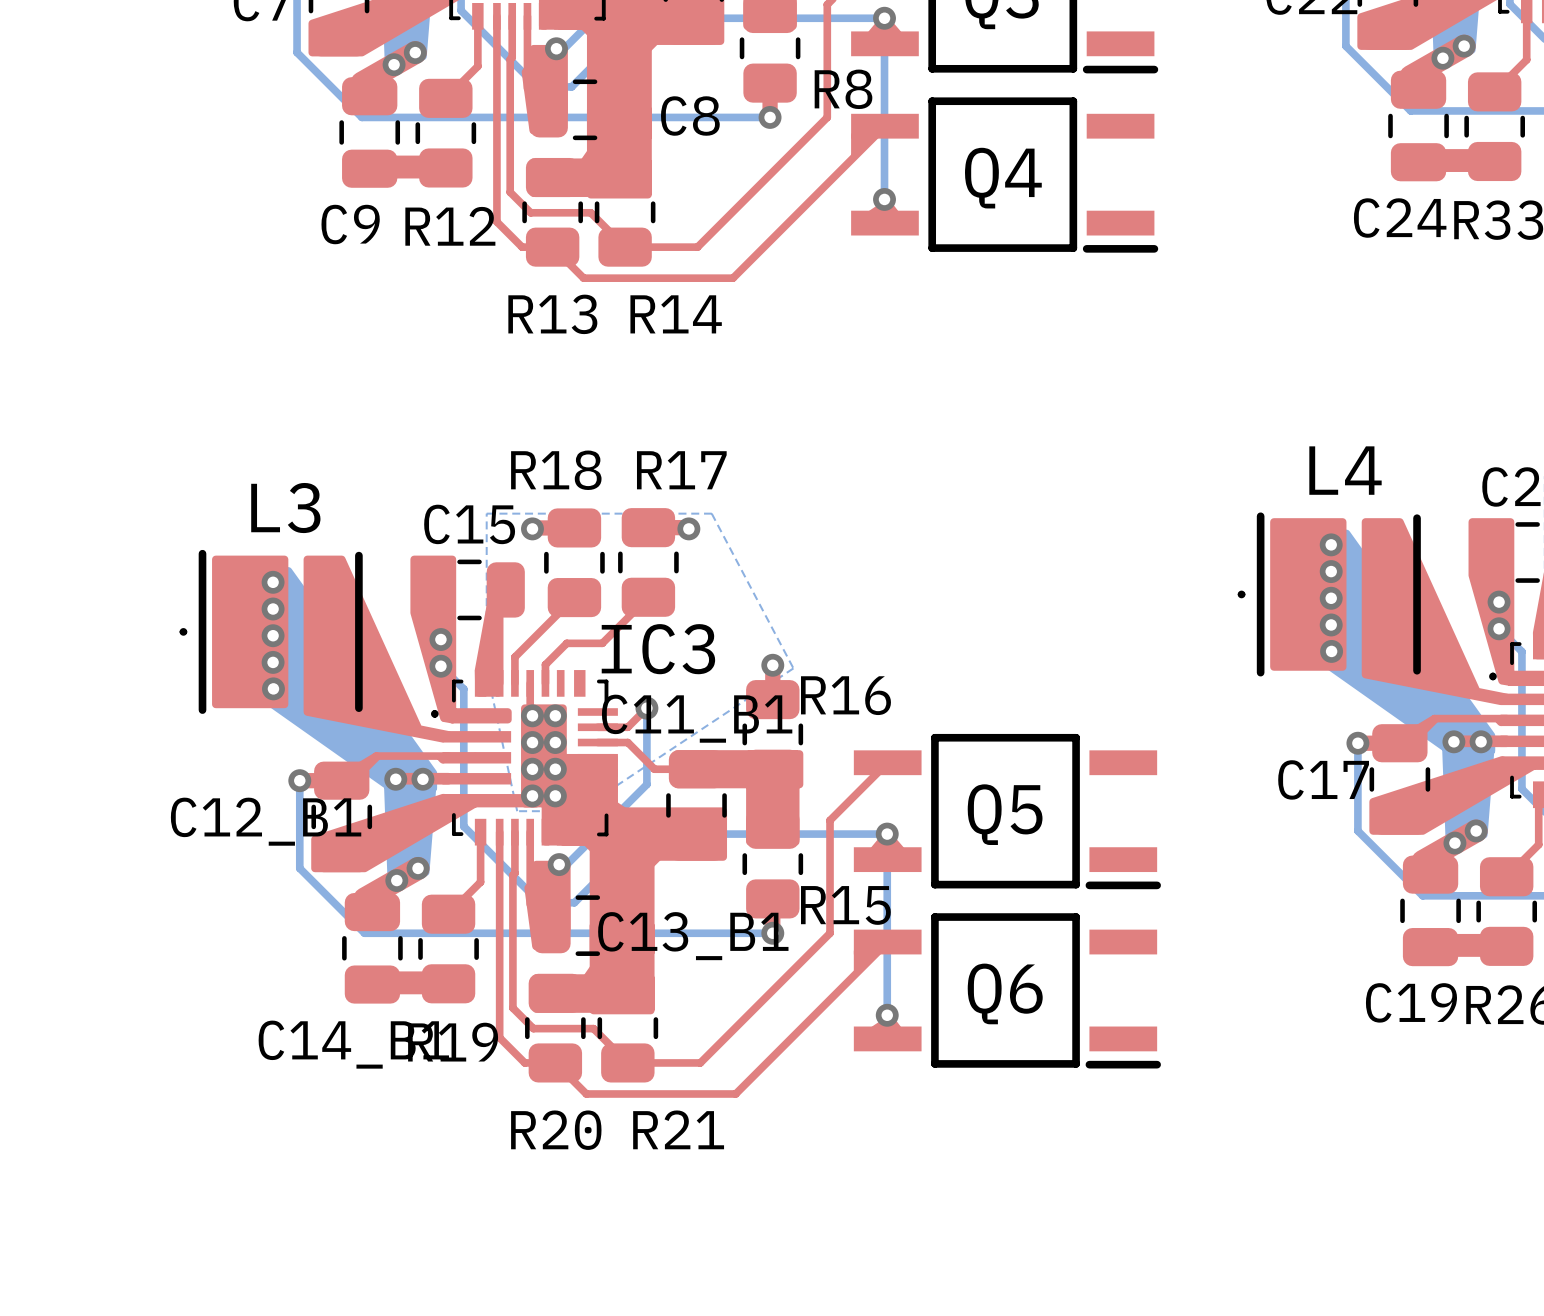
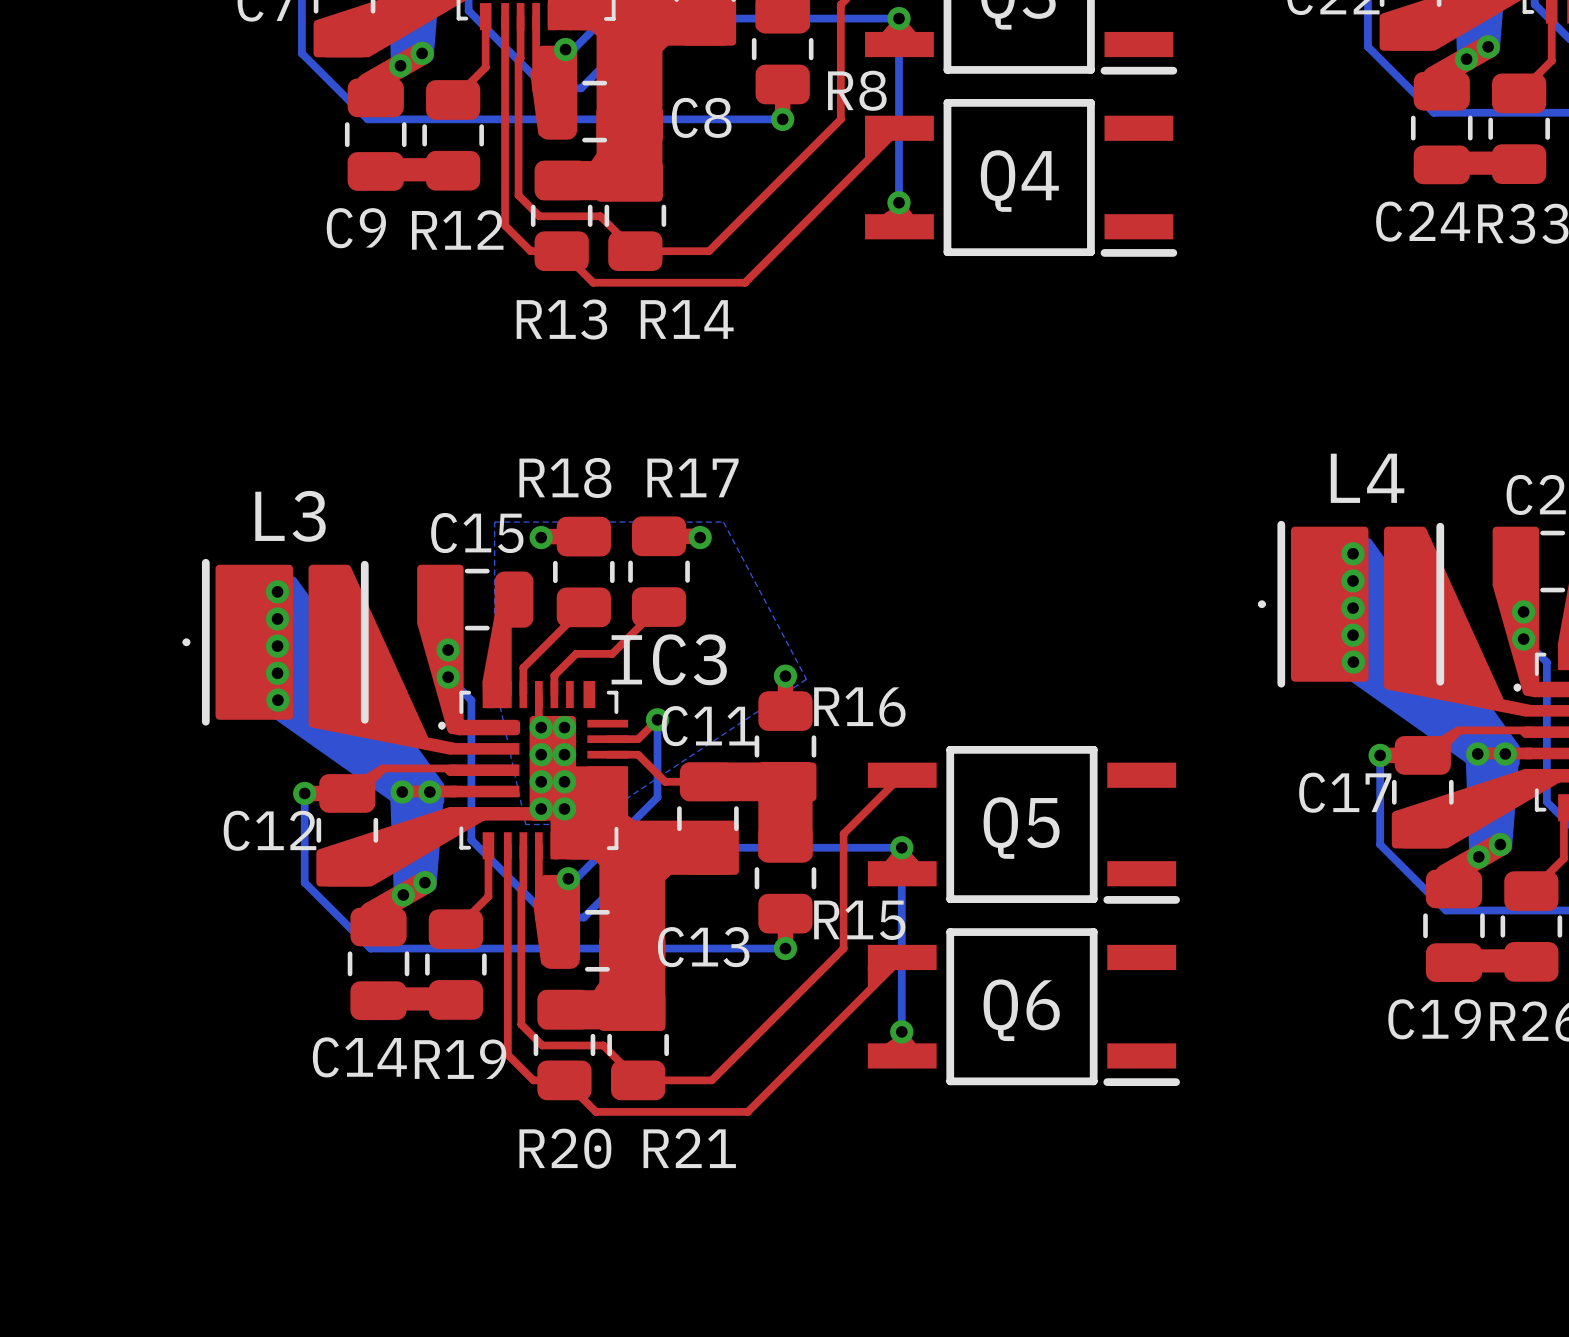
C11_B1 name: C11_B1 (697, 718) -> C11 (708, 726)
C12_B1 name: C12_B1 (266, 821) -> C12 (269, 830)
C13_B1 name: C13_B1 (693, 936) -> C13 (703, 947)
C14_B1 name: C14_B1 (353, 1044) -> C14 (359, 1057)

